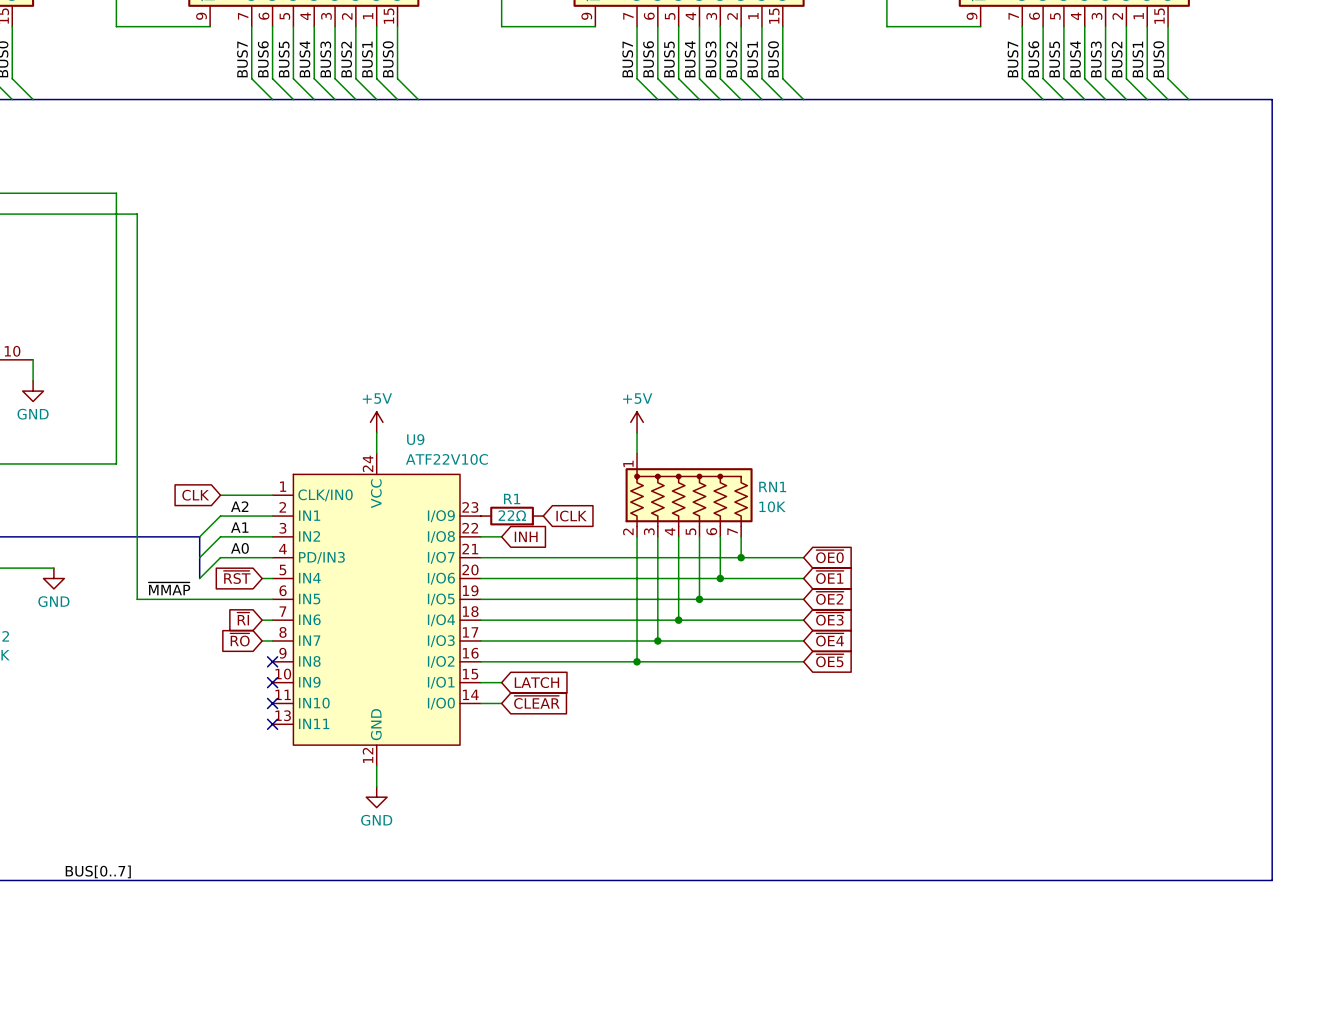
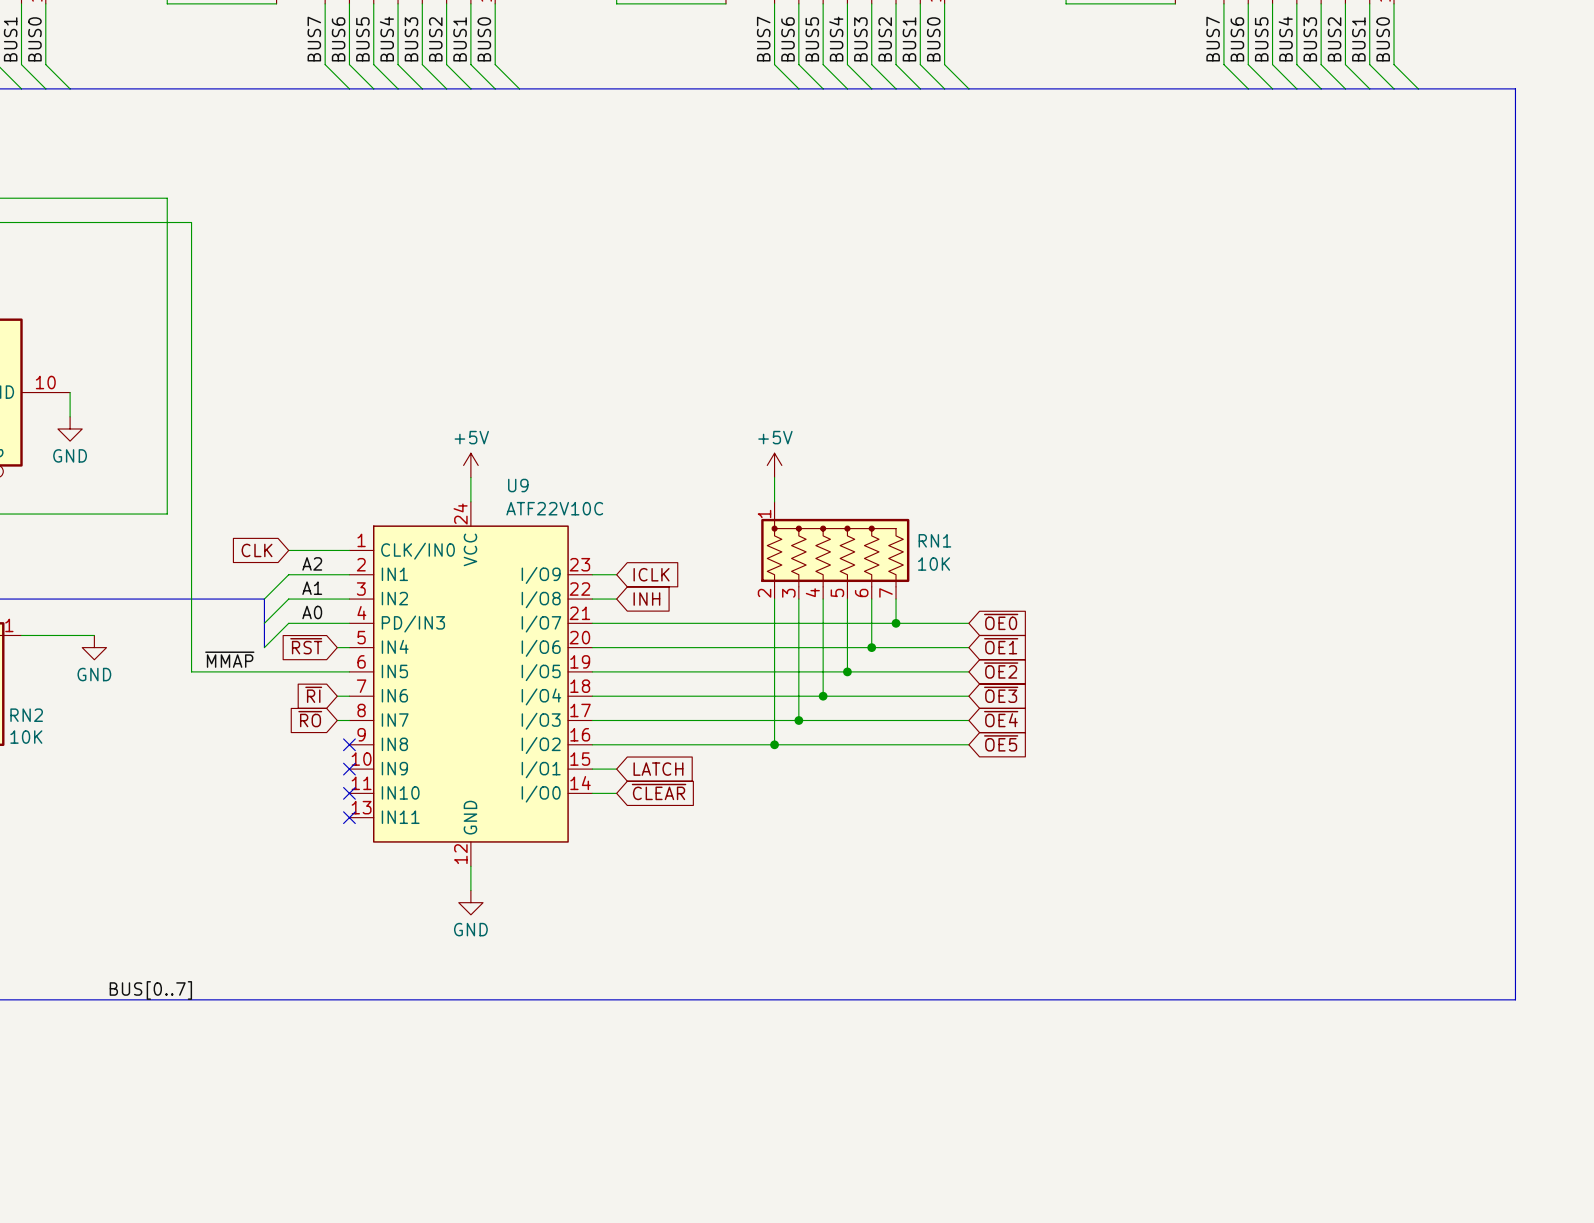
R1: 22Ω (512, 516) -> none
global label position: ICLK (571, 516) -> ICLK (651, 574)

